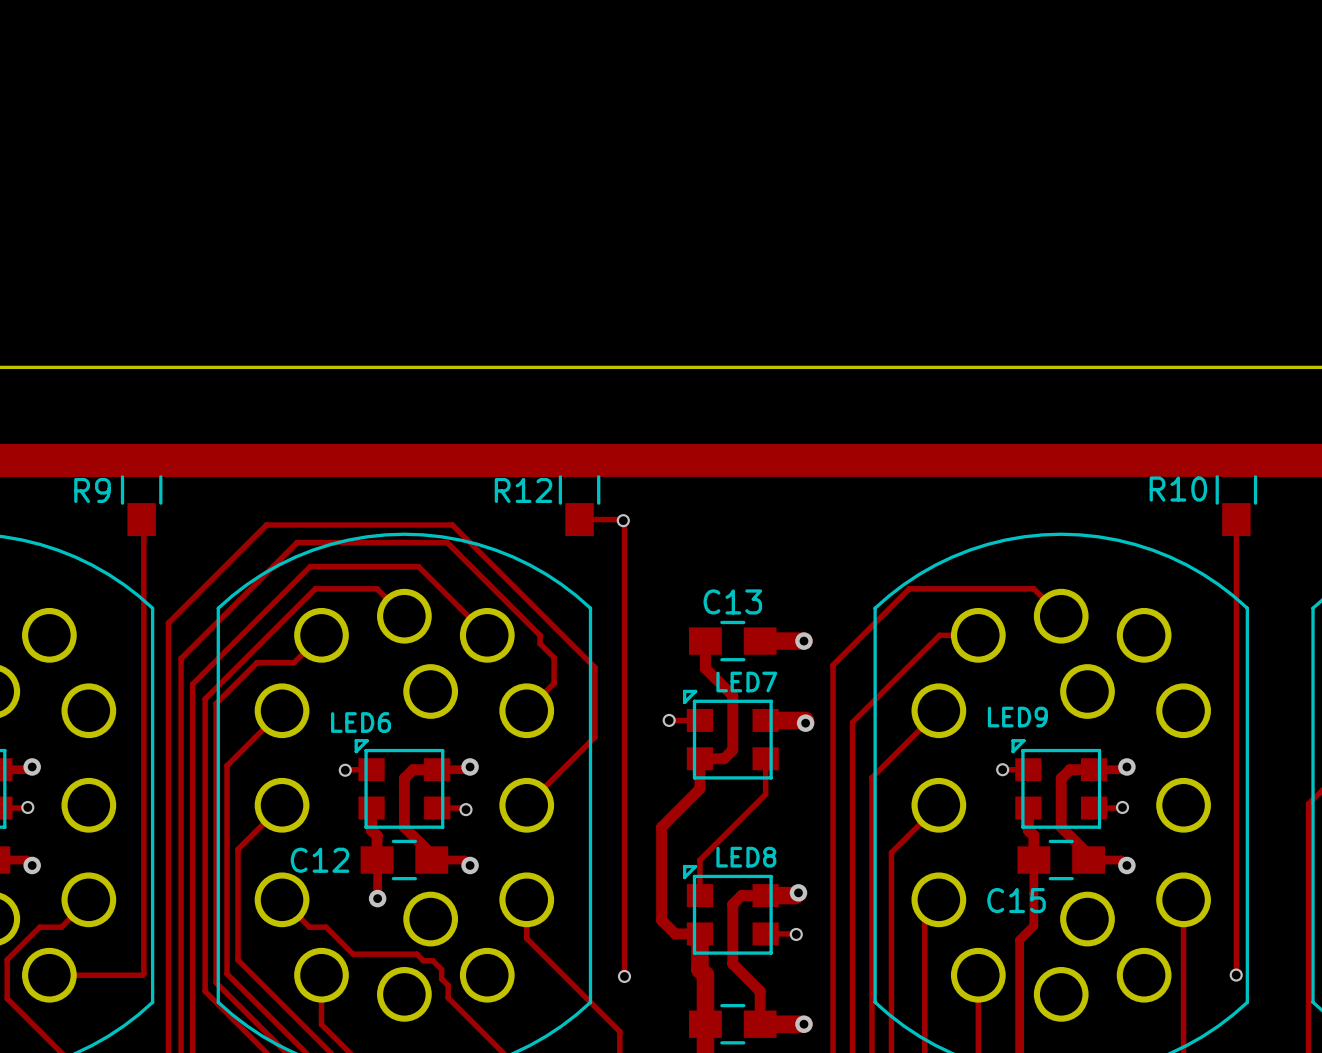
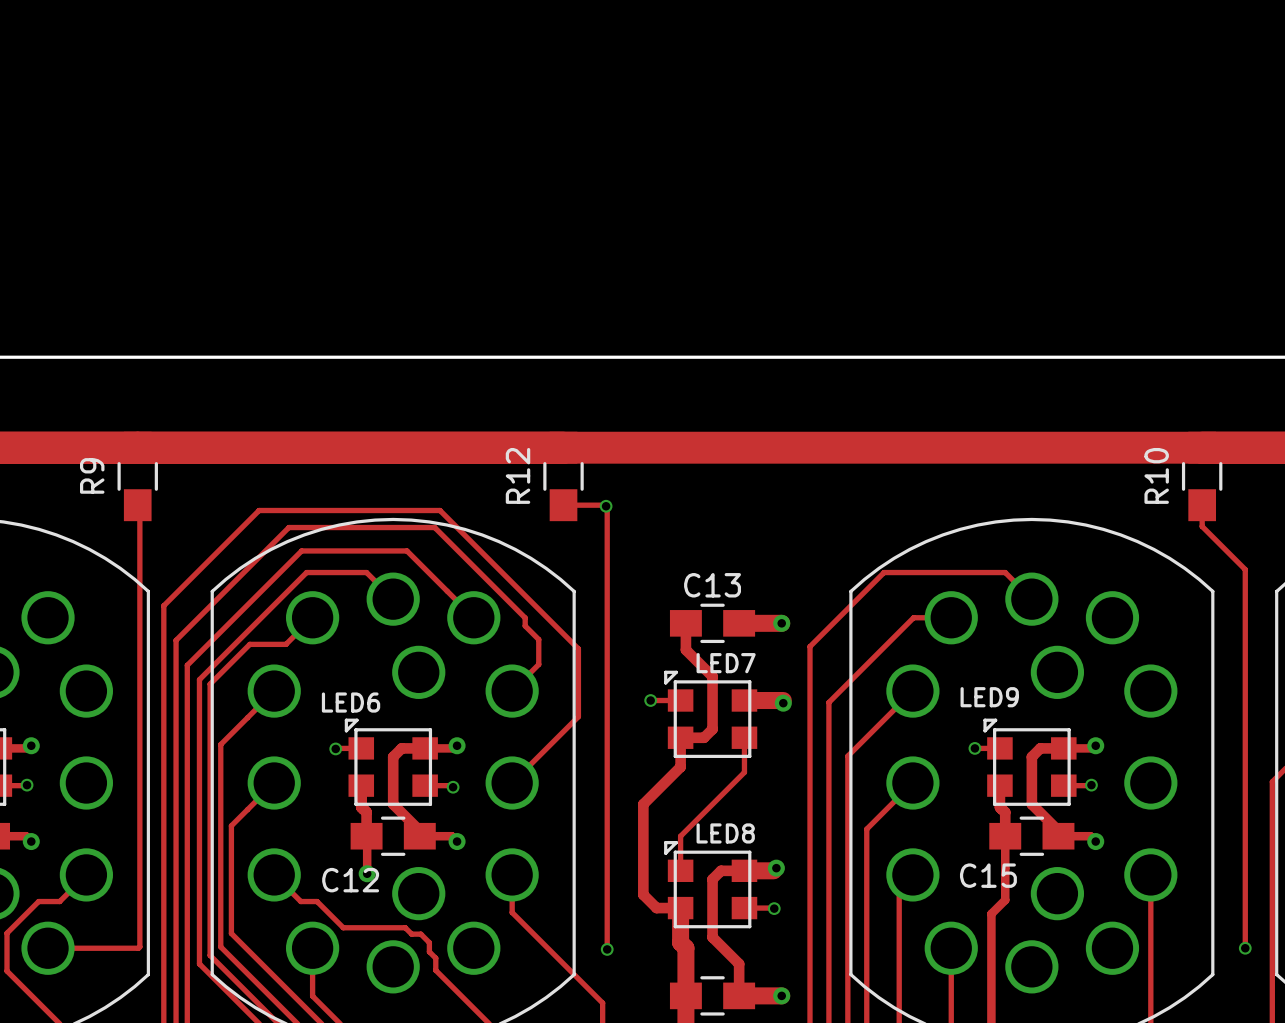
R10 name rotation: 0° (1178, 489) -> 90° counterclockwise (1156, 475)
R9 name rotation: 0° (92, 490) -> 90° counterclockwise (92, 475)
R12 name rotation: 0° (523, 490) -> 90° counterclockwise (518, 475)
track: (1236, 541) (1236, 974) -> (1202, 526) (1245, 569) (1245, 948)
C12 name position: C12 (320, 860) -> C12 (350, 880)
via position: (1236, 975) -> (1245, 948)

